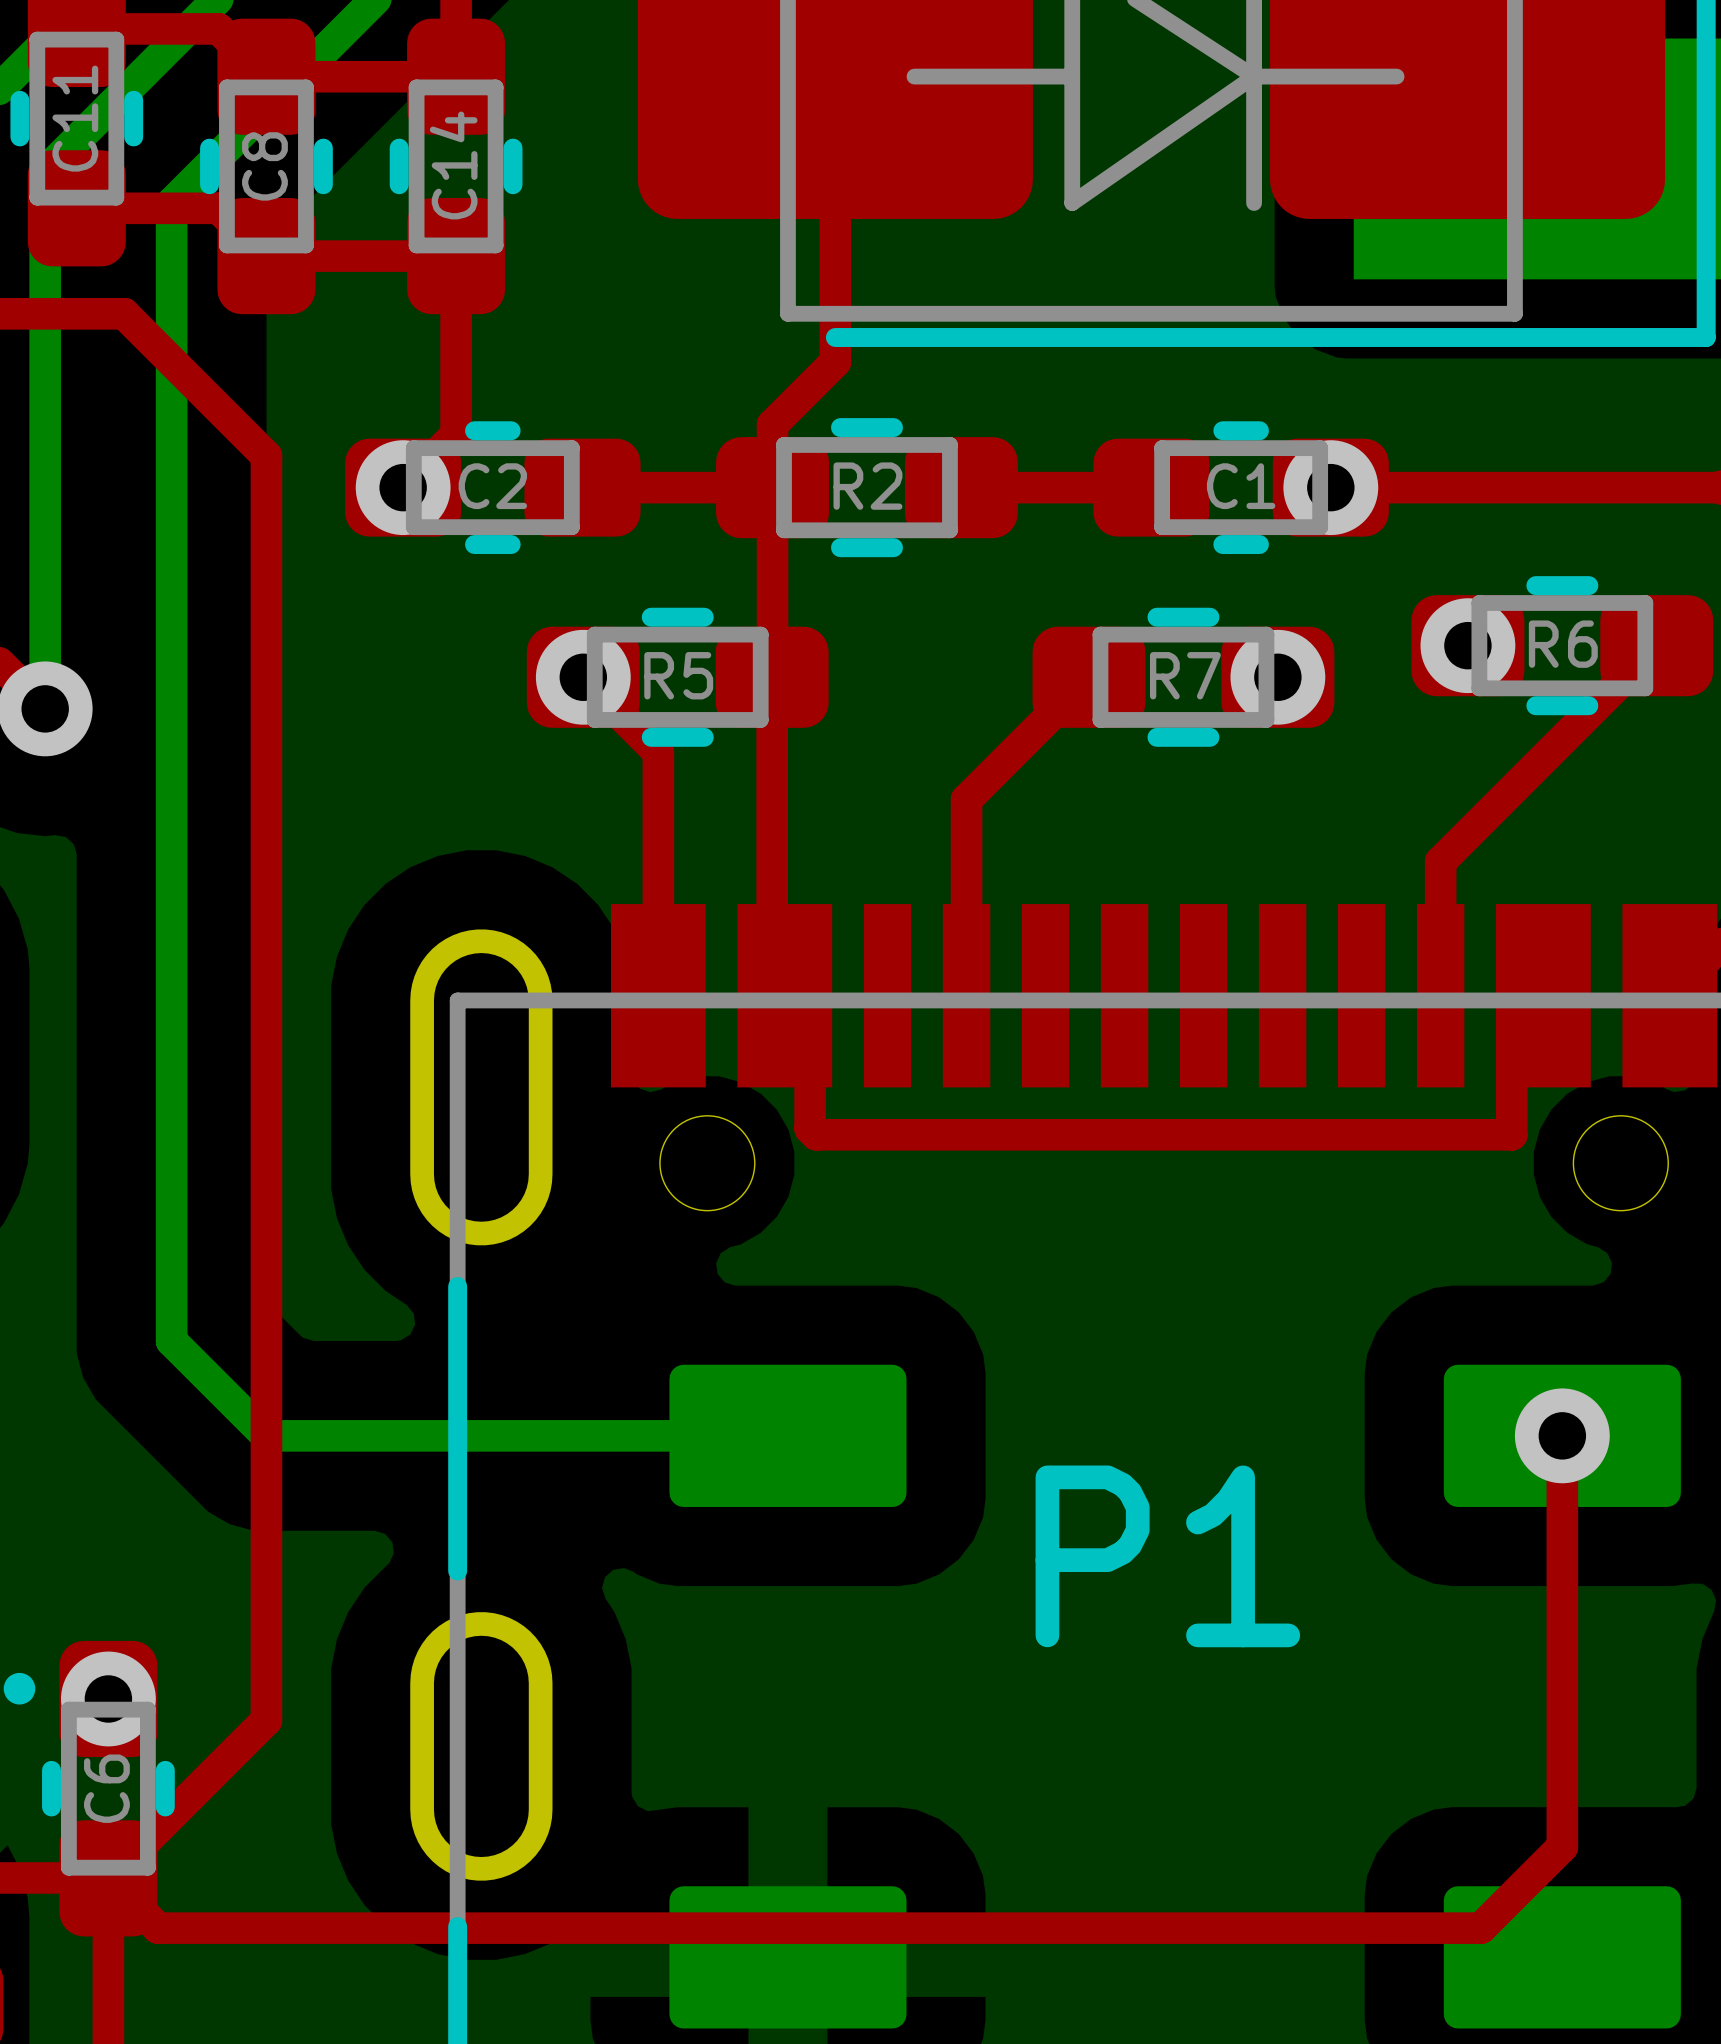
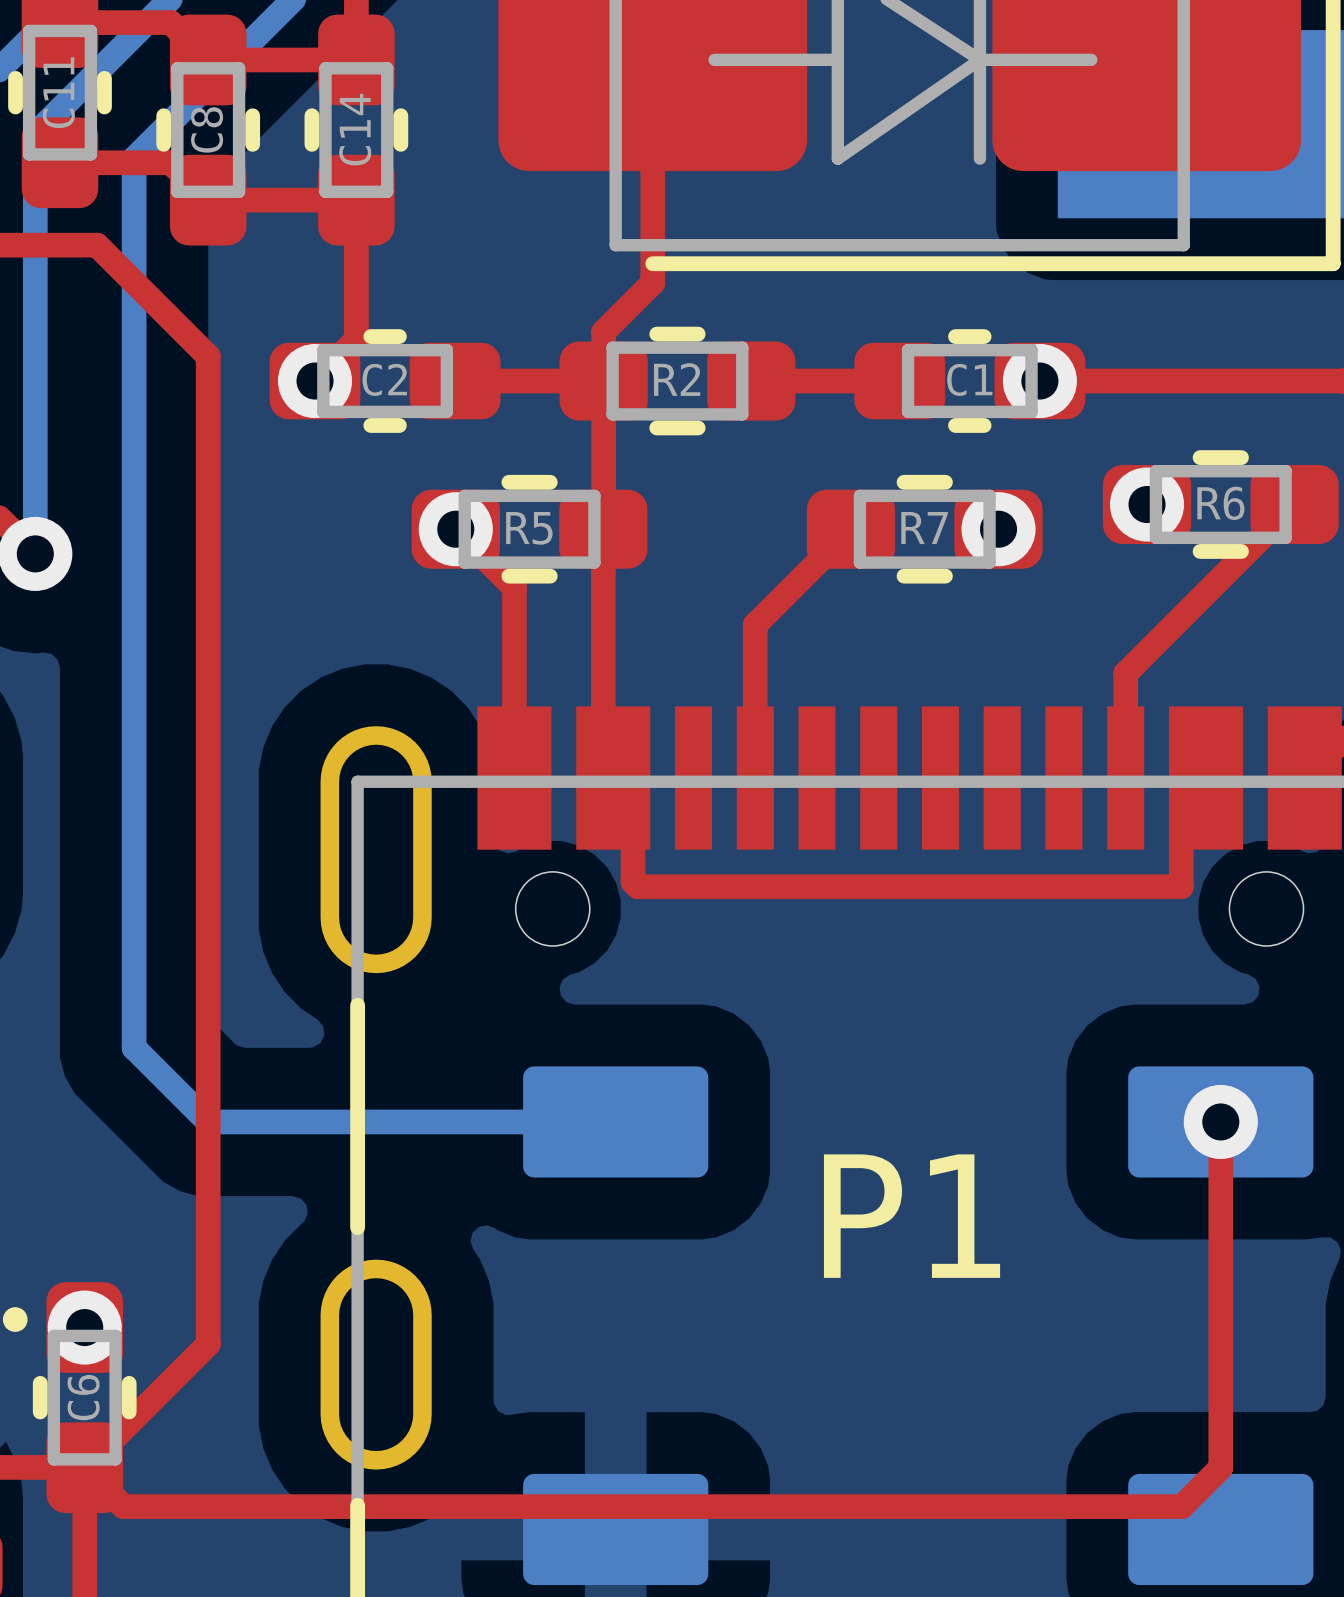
top track: (1562, 1846) (1480, 1928) -> (1220, 1443) (1220, 1467) (1181, 1506) (1157, 1506)

